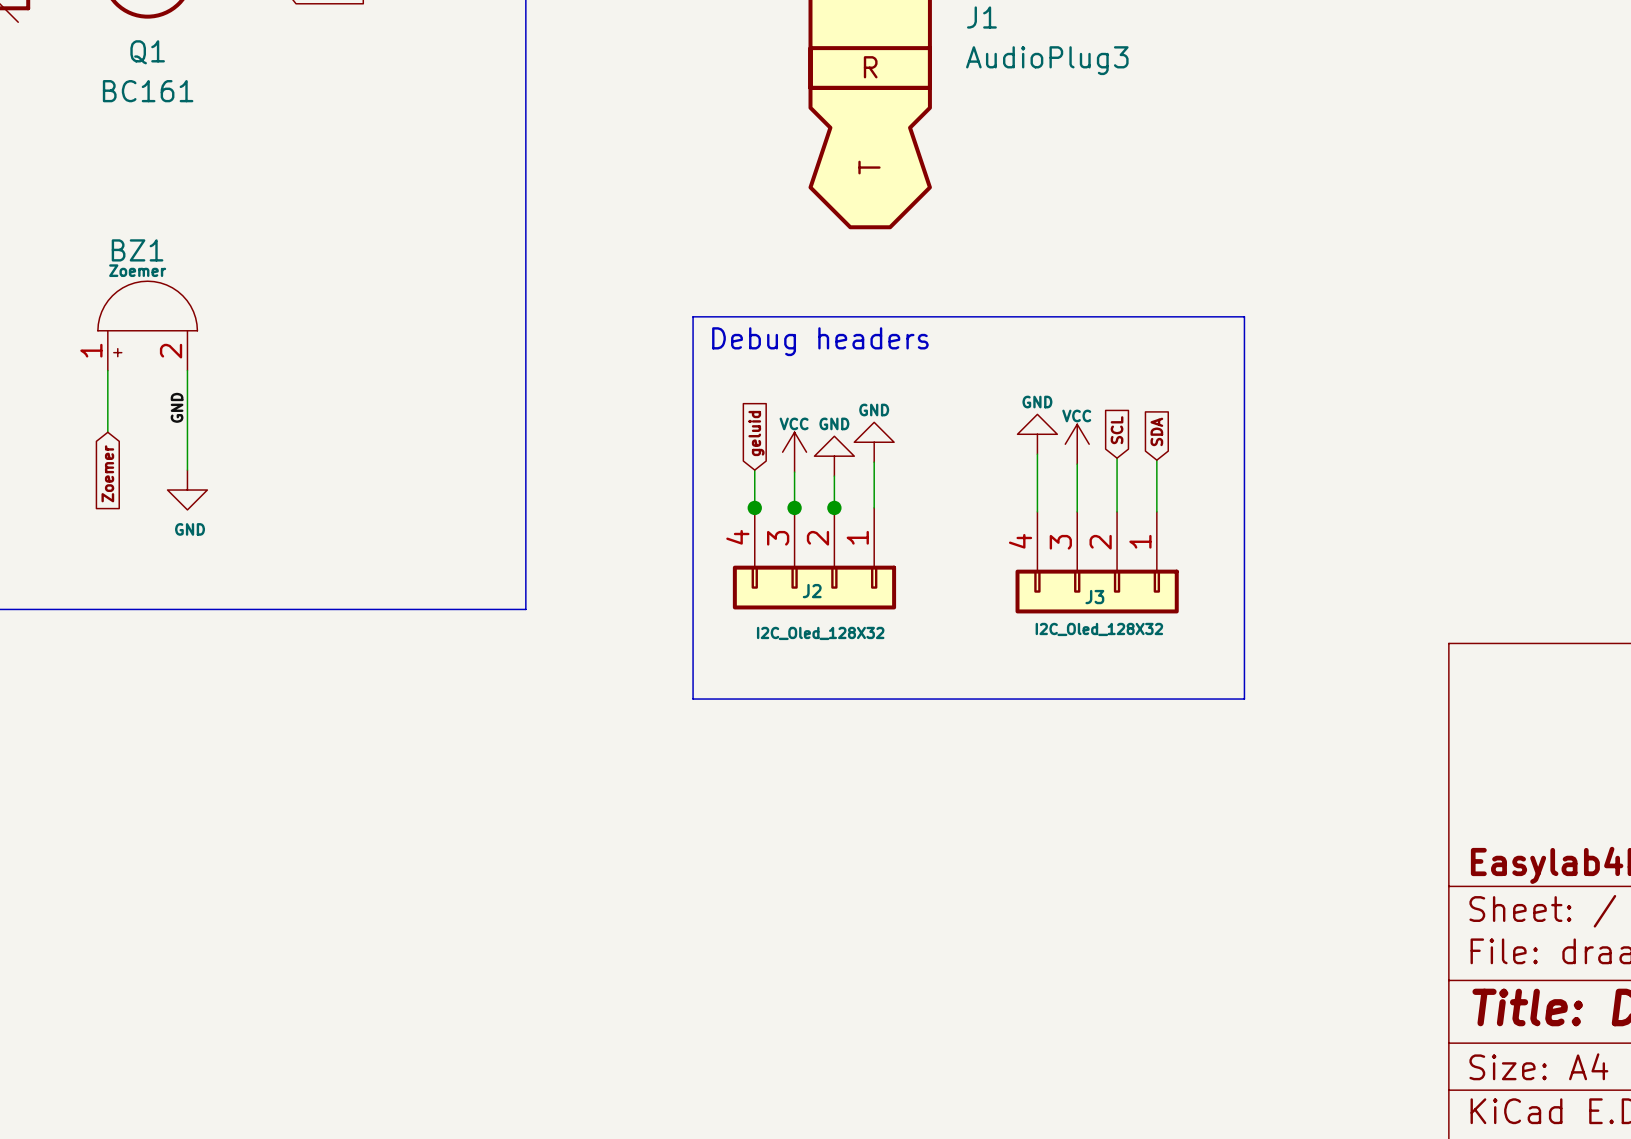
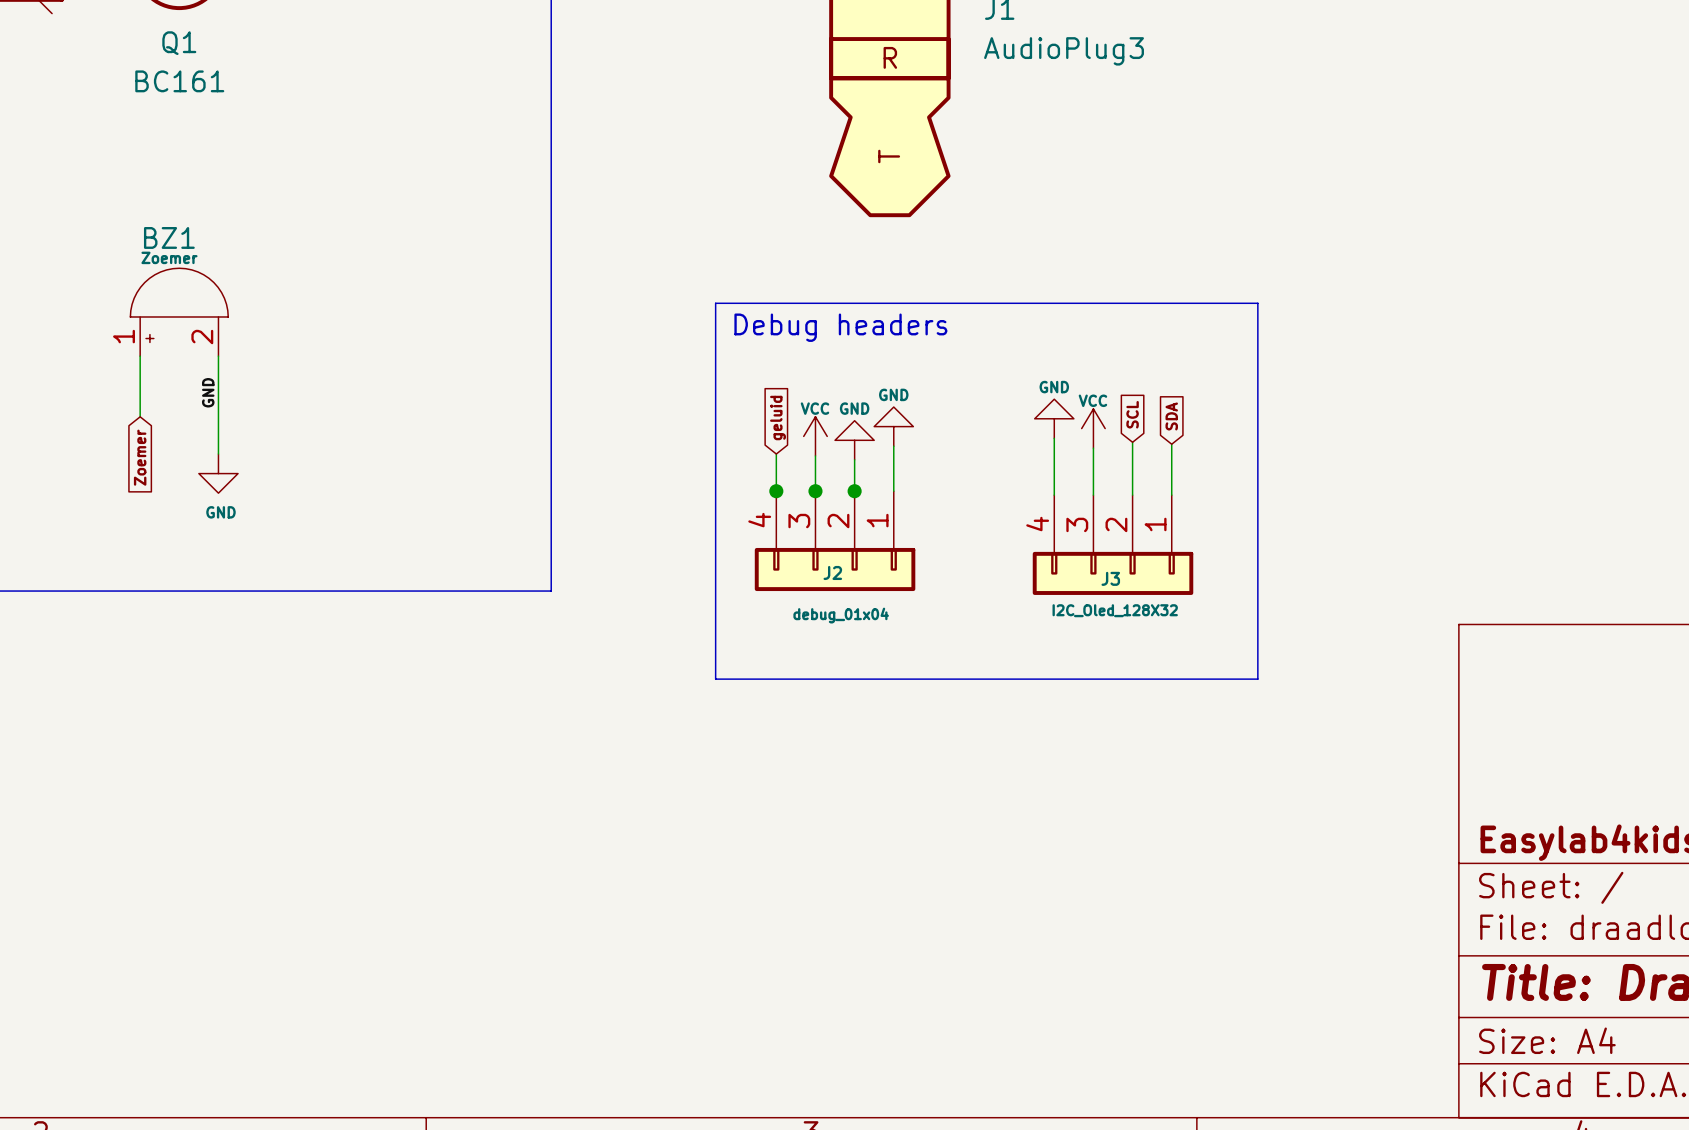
J2 value: I2C_Oled_128X32 (820, 633) -> debug_01x04 (841, 615)

